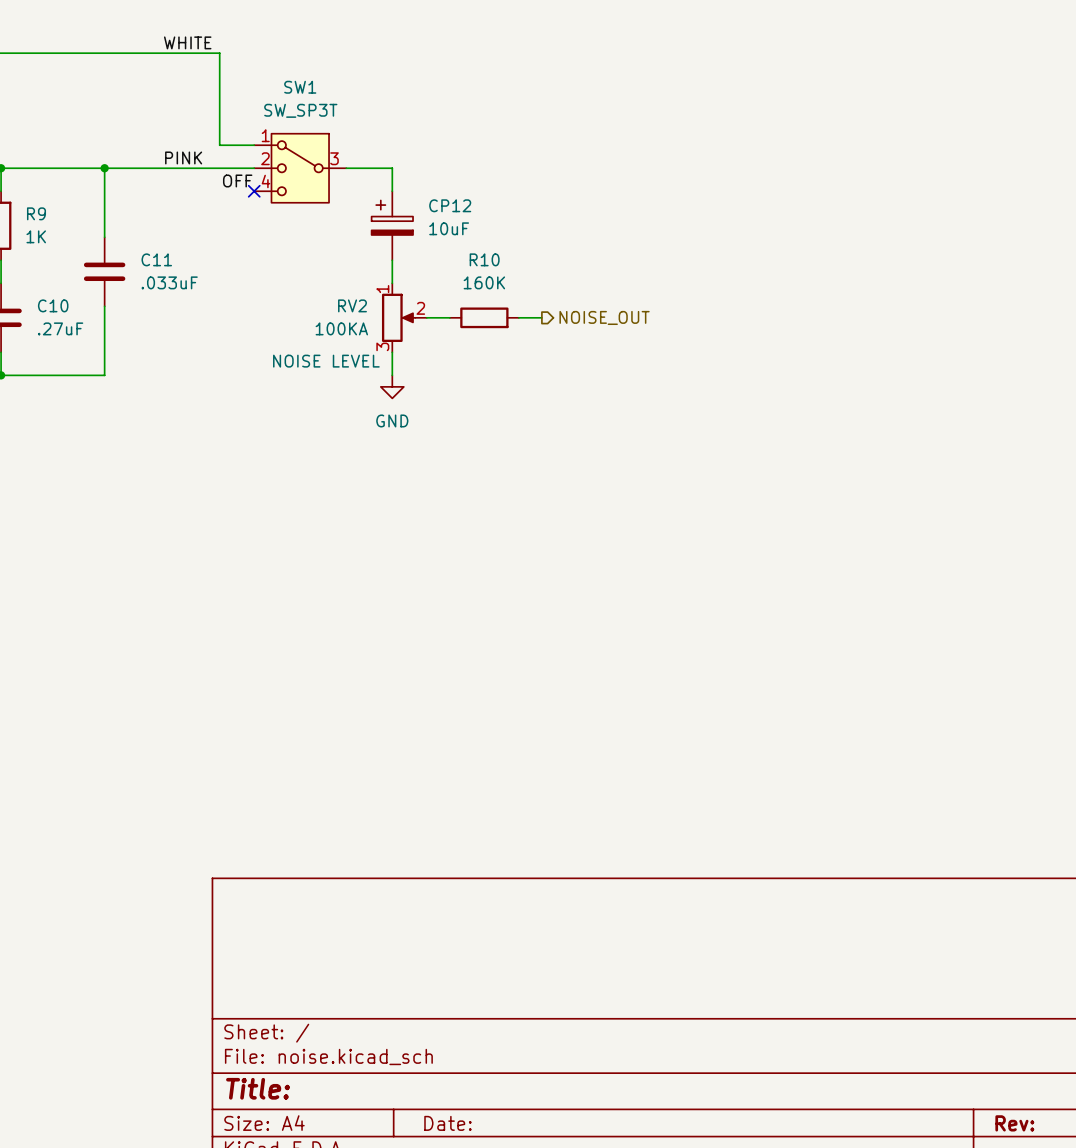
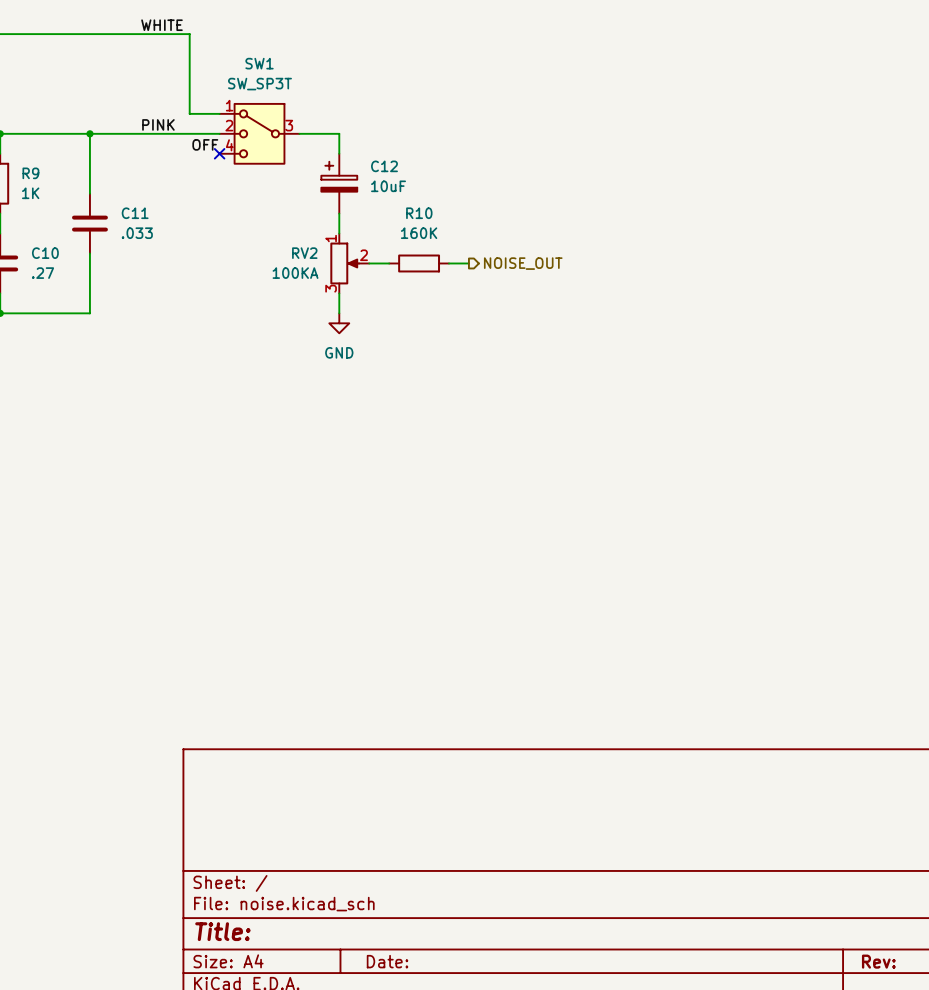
CP12 name: CP12 (450, 205) -> C12 (384, 166)
C11 value: .033uF (169, 282) -> .033 (137, 233)
C10 value: .27uF (60, 328) -> .27 (43, 273)
RV2 text: NOISE LEVEL (326, 361) -> none

